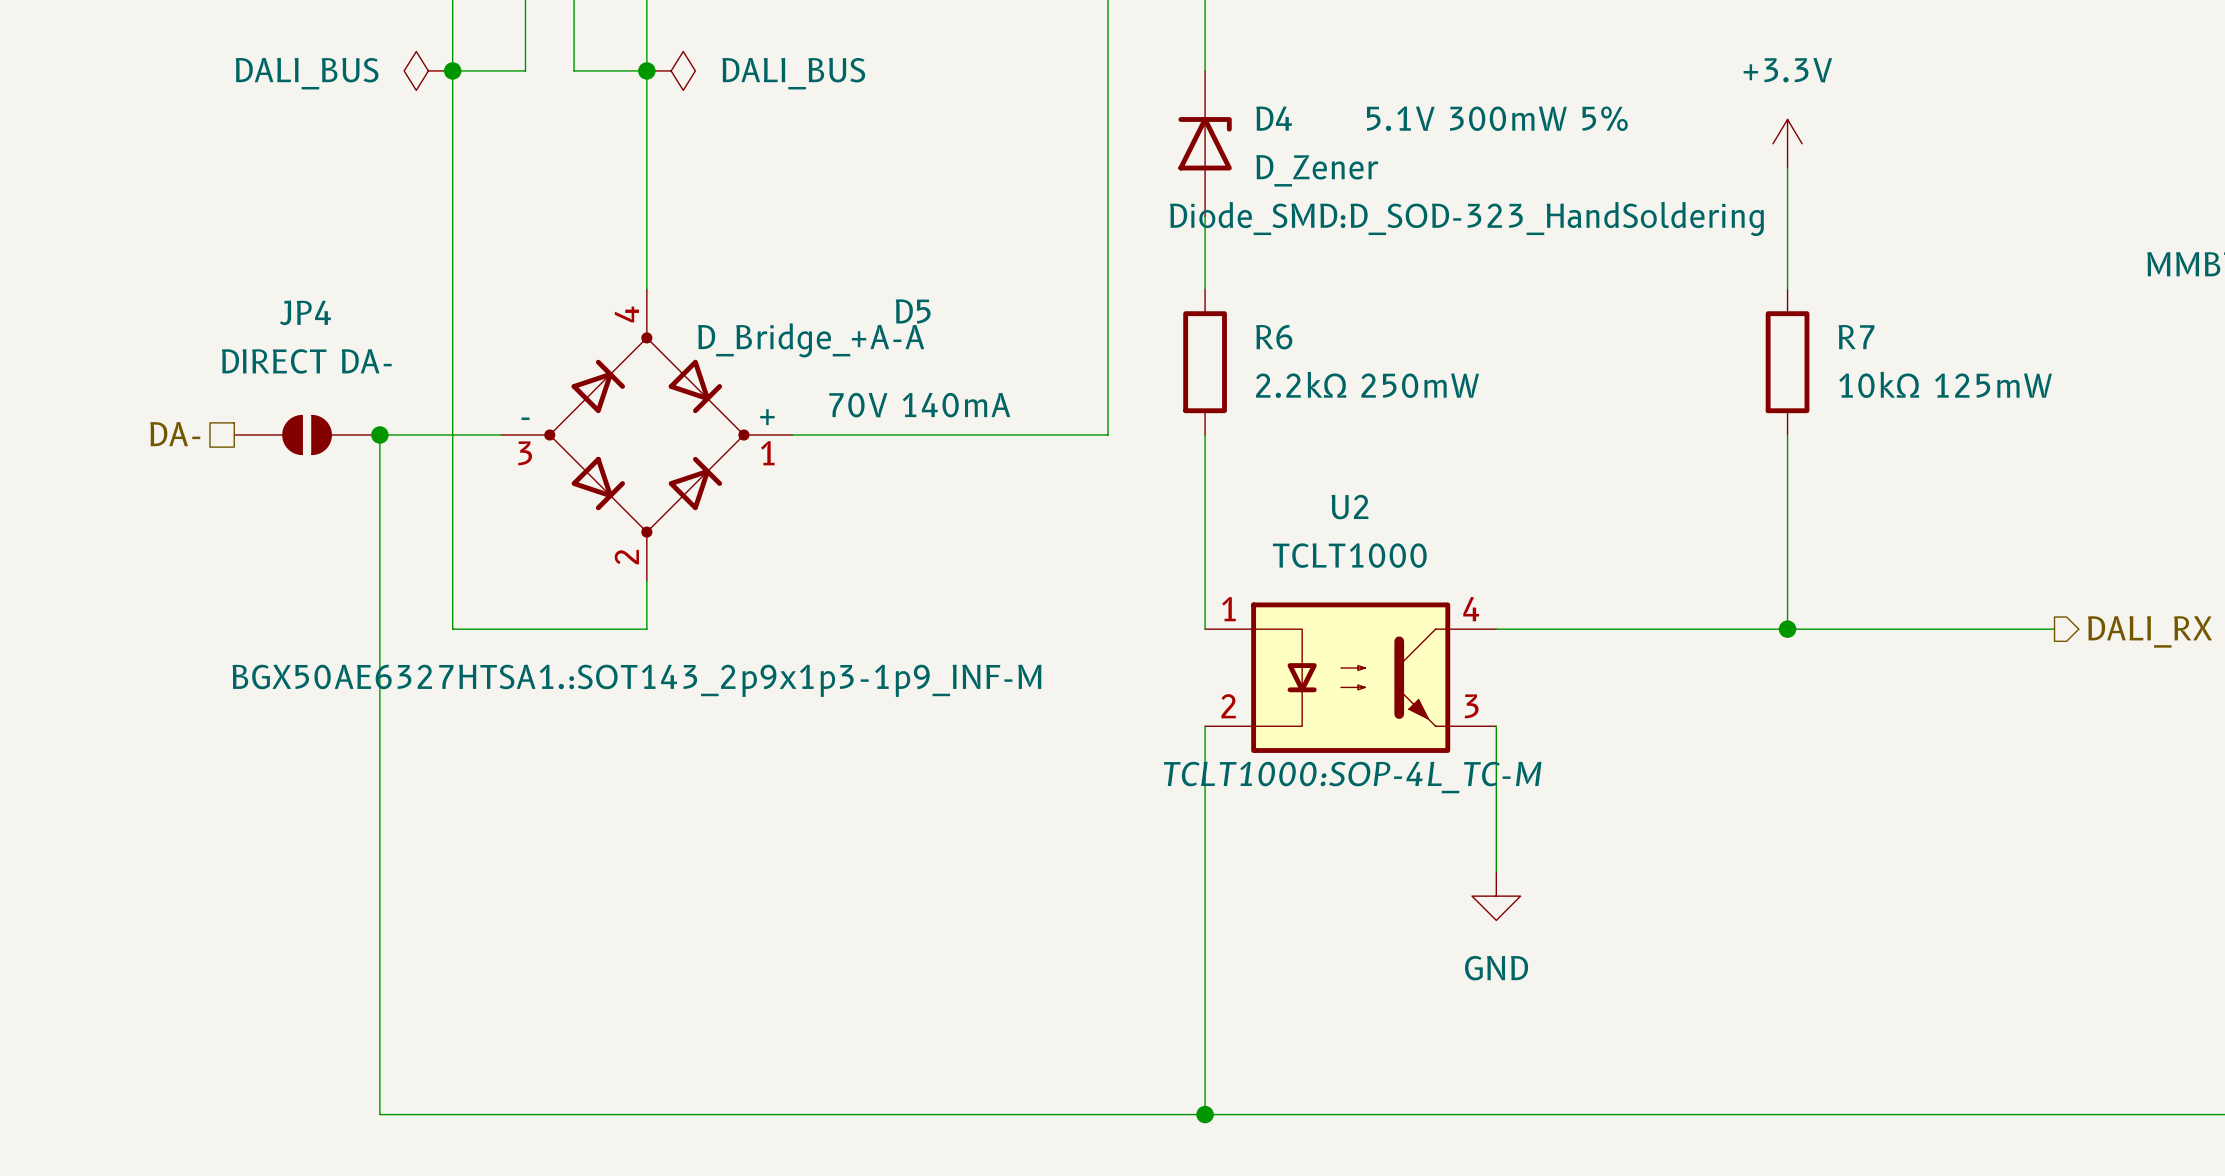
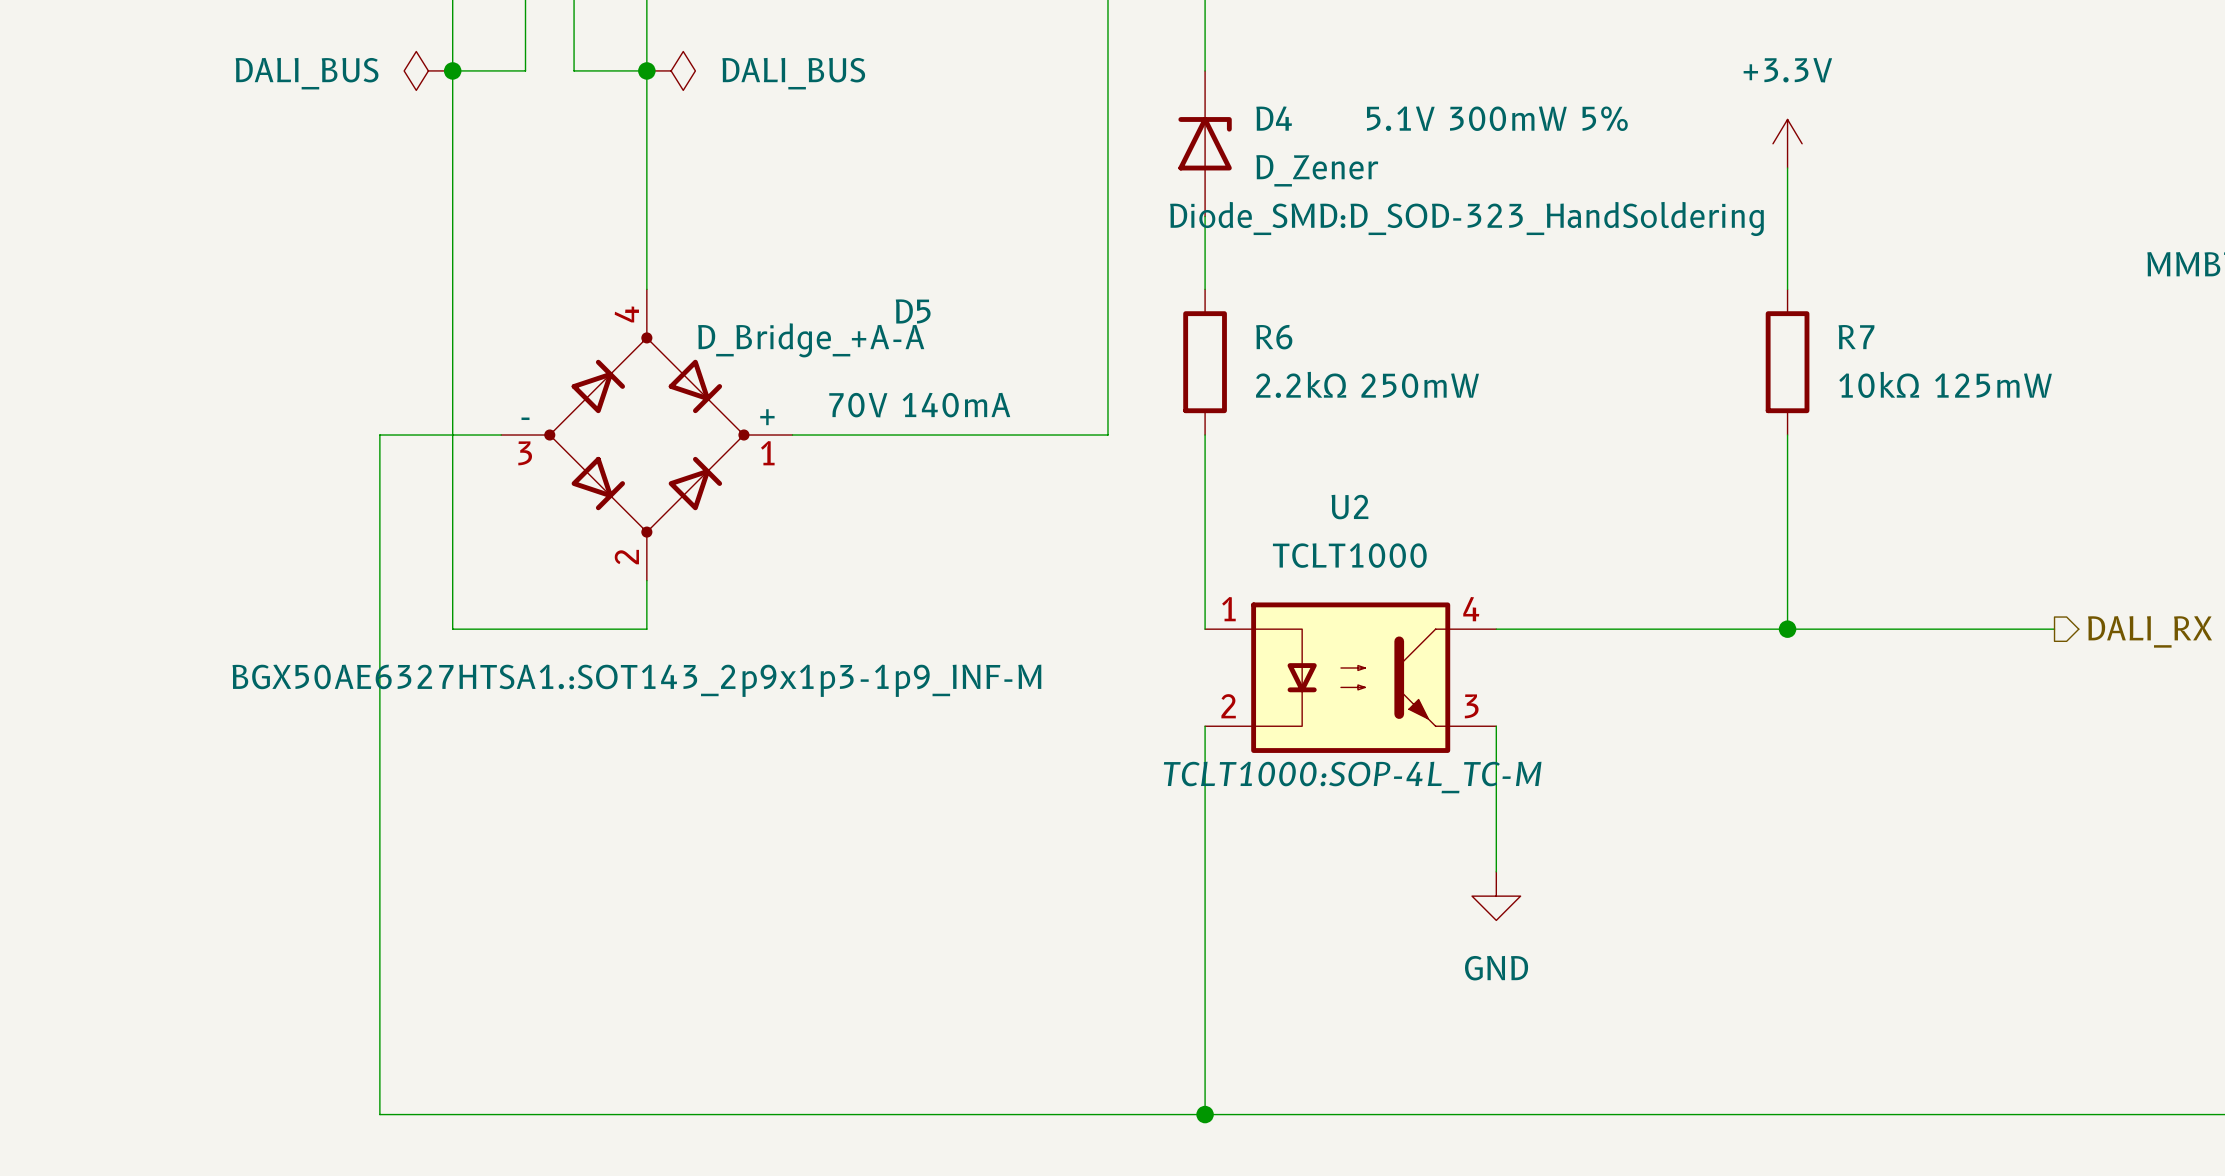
hierarchical label: DA- (175, 434) -> none
JP4: DIRECT DA- (307, 435) -> none
junction: (379, 435) -> none

